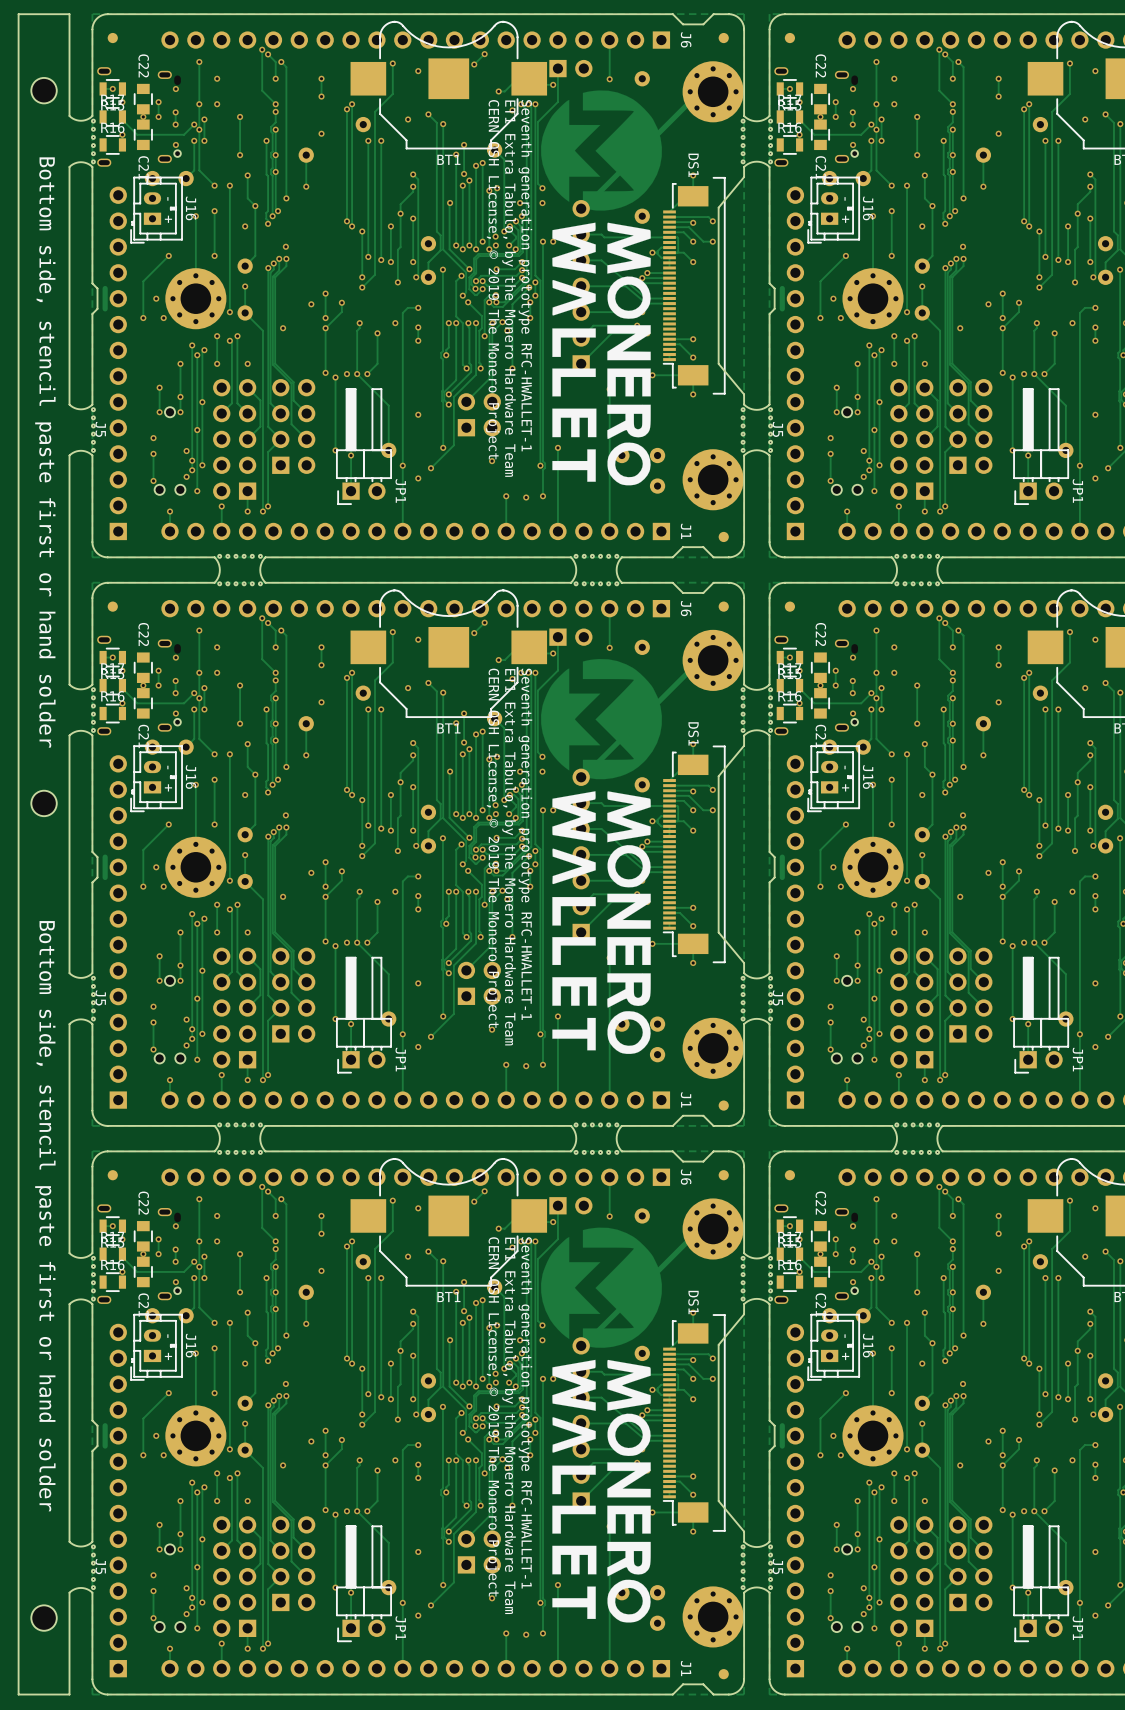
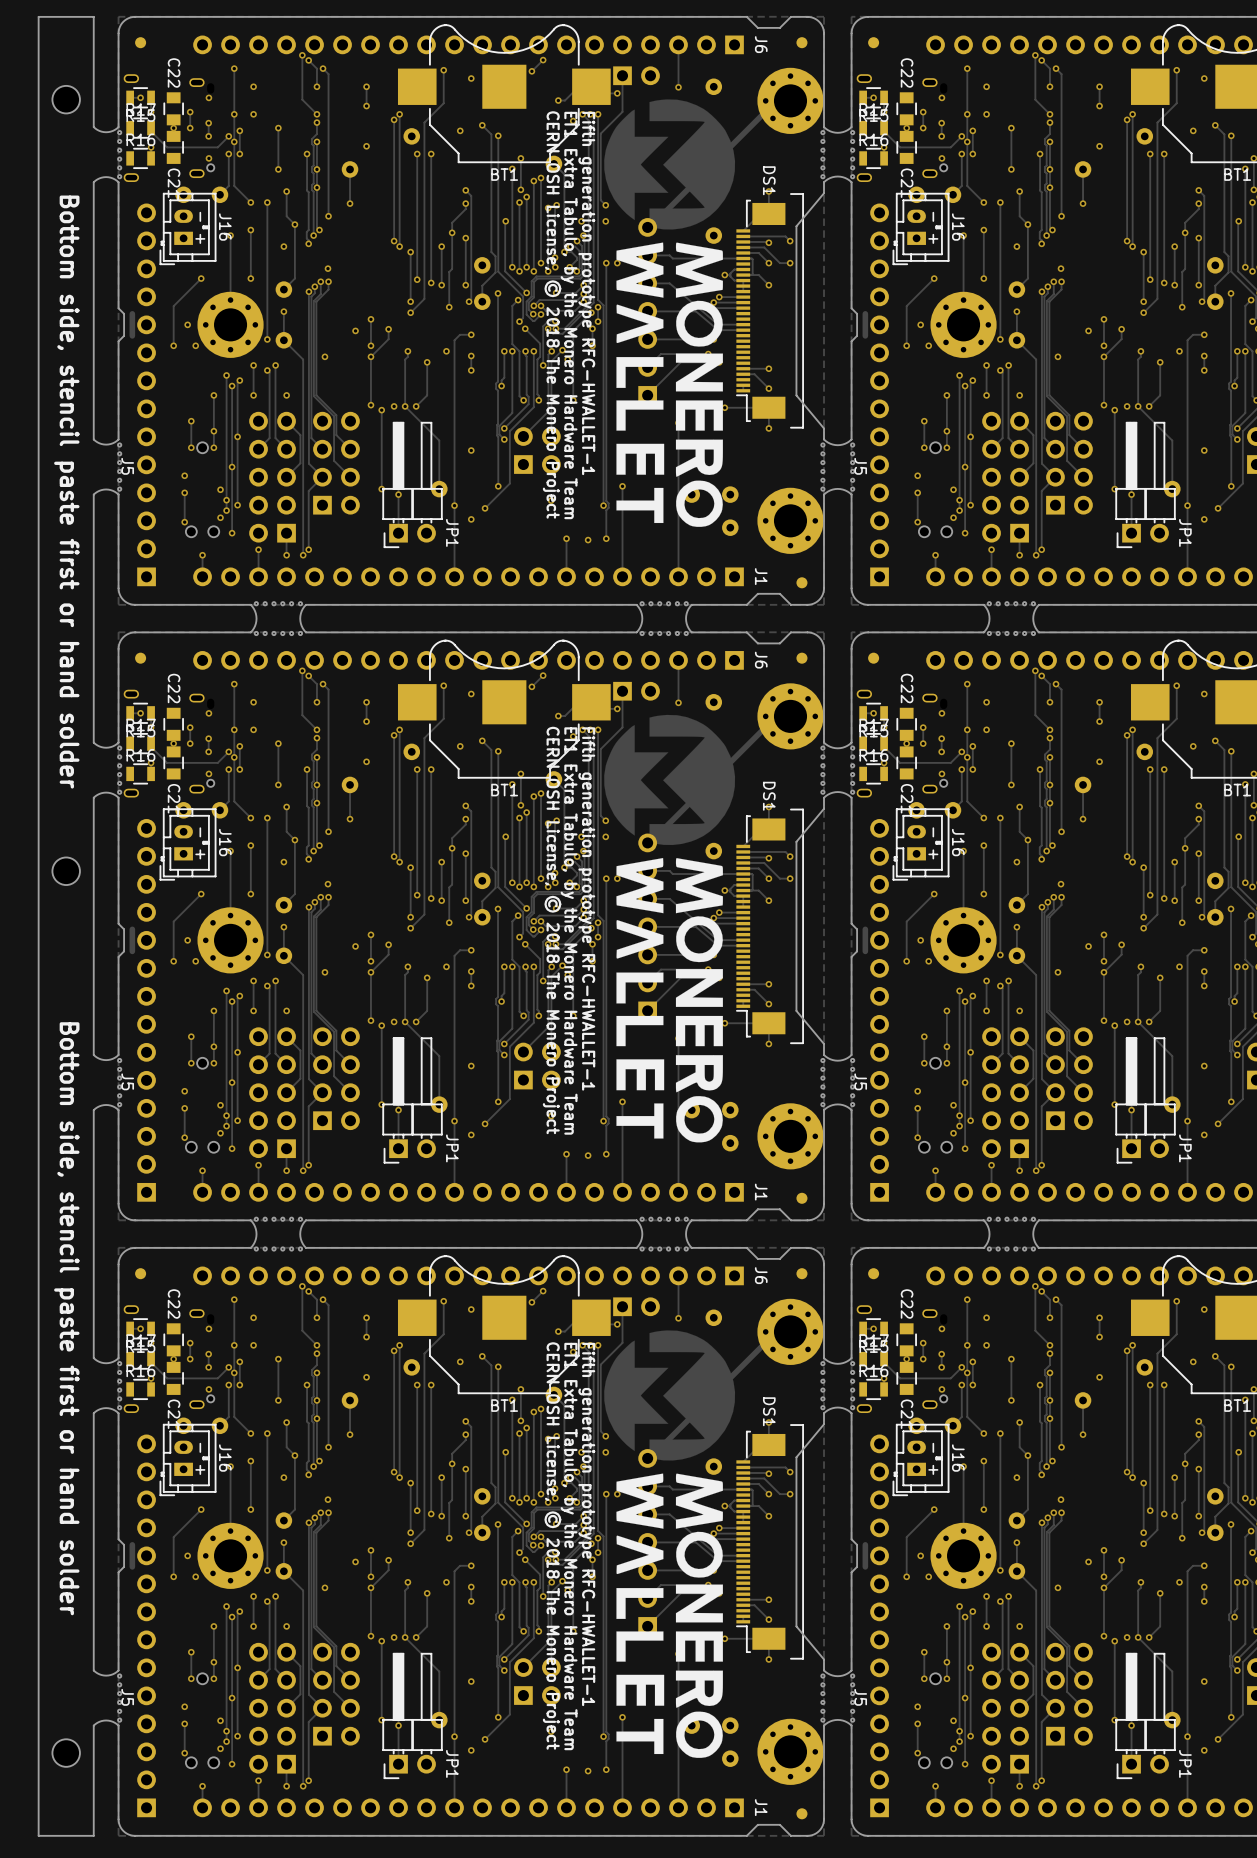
text: Seventh generation prototype RFC-HWALLET-1 (525, 275) -> Fifth generation prototype RFC-HWALLET-1 (586, 293)
text: CERN OSH License, © 2019 The Monero Project (492, 279) -> CERN OSH License, © 2018 The Monero Project (552, 314)
text: Seventh generation prototype RFC-HWALLET-1 (525, 844) -> Fifth generation prototype RFC-HWALLET-1 (586, 908)
text: CERN OSH License, © 2019 The Monero Project (492, 848) -> CERN OSH License, © 2018 The Monero Project (552, 930)
text: Seventh generation prototype RFC-HWALLET-1 (525, 1412) -> Fifth generation prototype RFC-HWALLET-1 (586, 1524)
text: CERN OSH License, © 2019 The Monero Project (492, 1416) -> CERN OSH License, © 2018 The Monero Project (552, 1545)

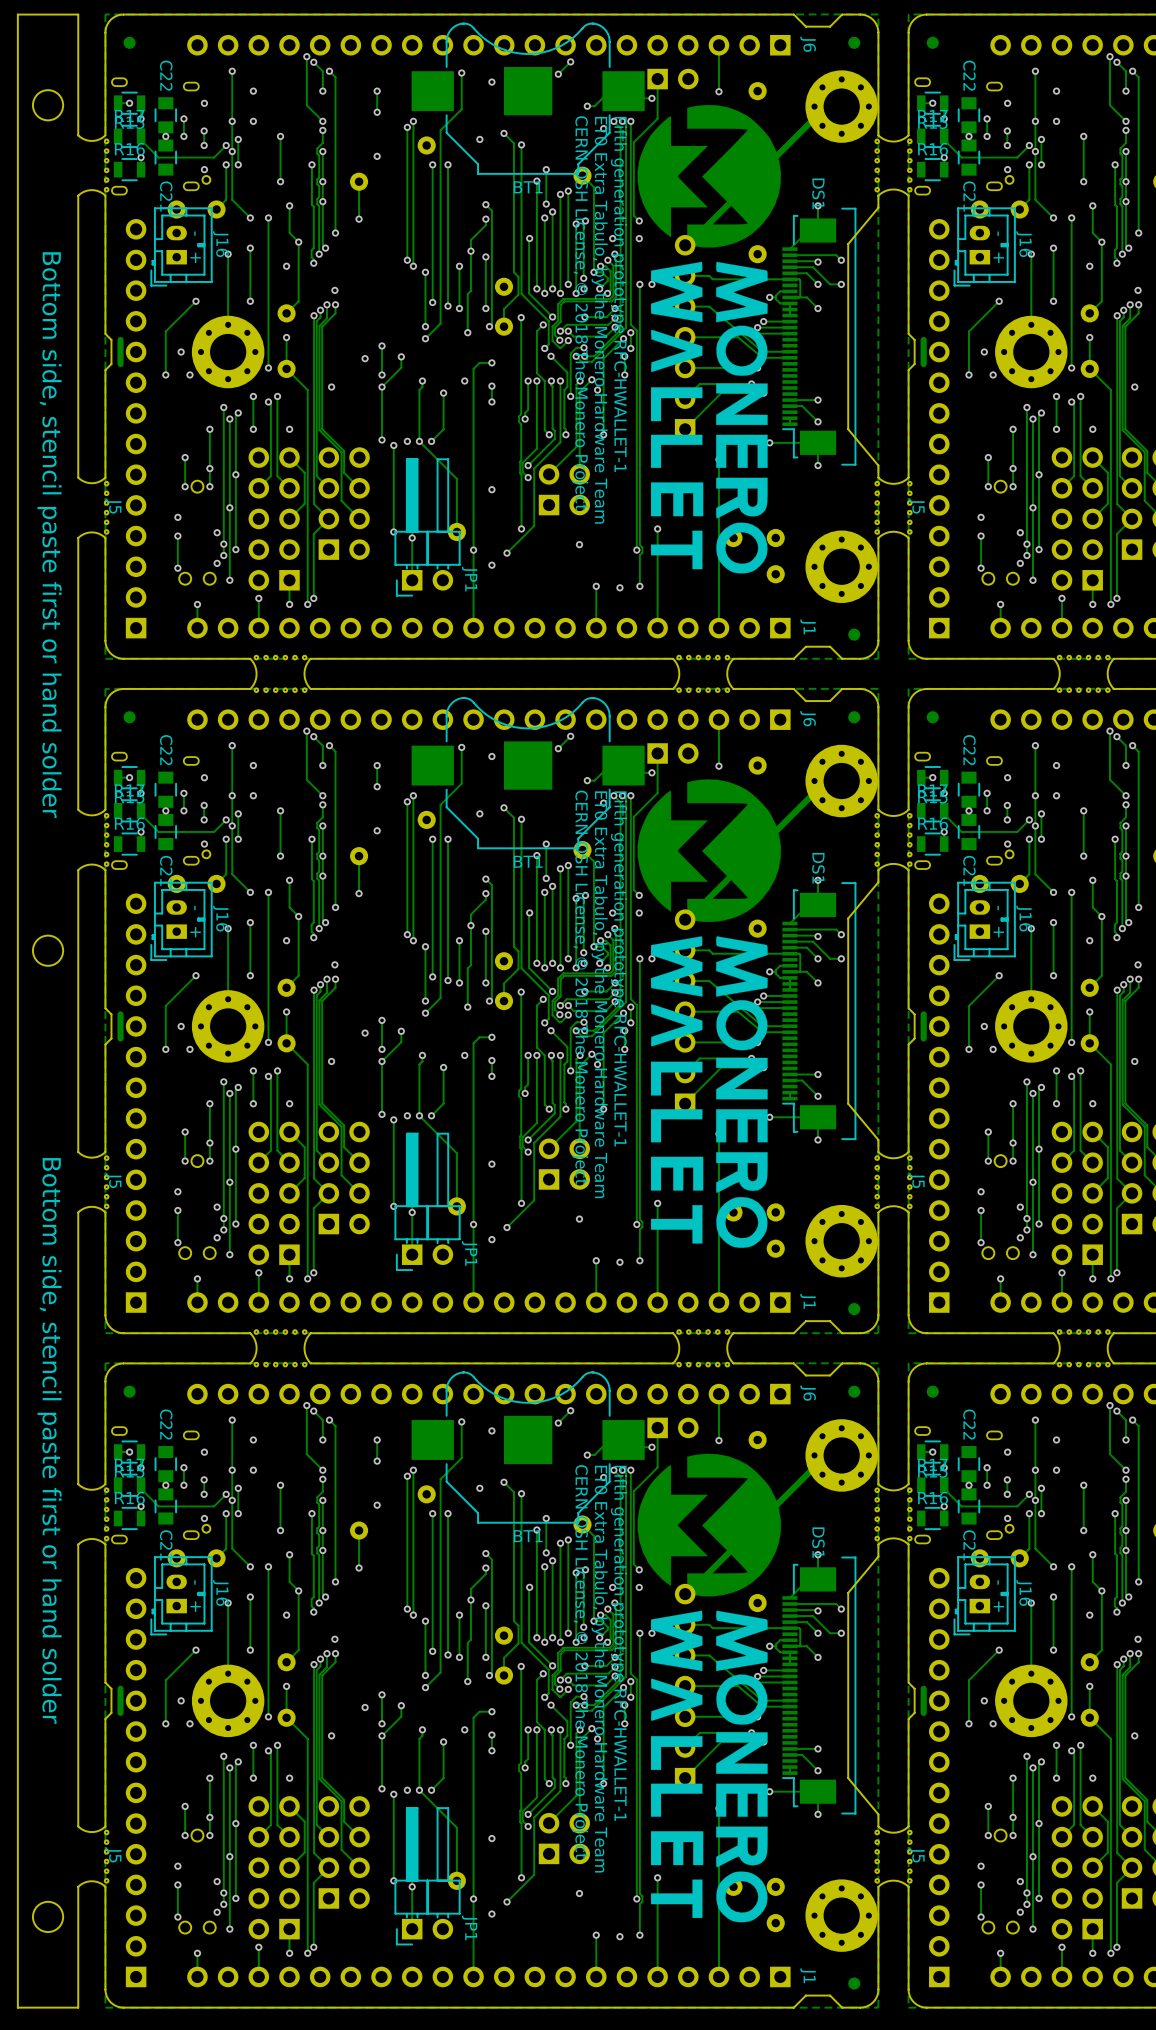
text: ET1 Extra Tabulo, by the Monero Hardware Team (569, 315) -> ET0 Extra Tabulo, by the Monero Hardware Team (599, 320)
text: ET1 Extra Tabulo, by the Monero Hardware Team (569, 931) -> ET0 Extra Tabulo, by the Monero Hardware Team (599, 994)
text: ET1 Extra Tabulo, by the Monero Hardware Team (569, 1546) -> ET0 Extra Tabulo, by the Monero Hardware Team (599, 1669)

